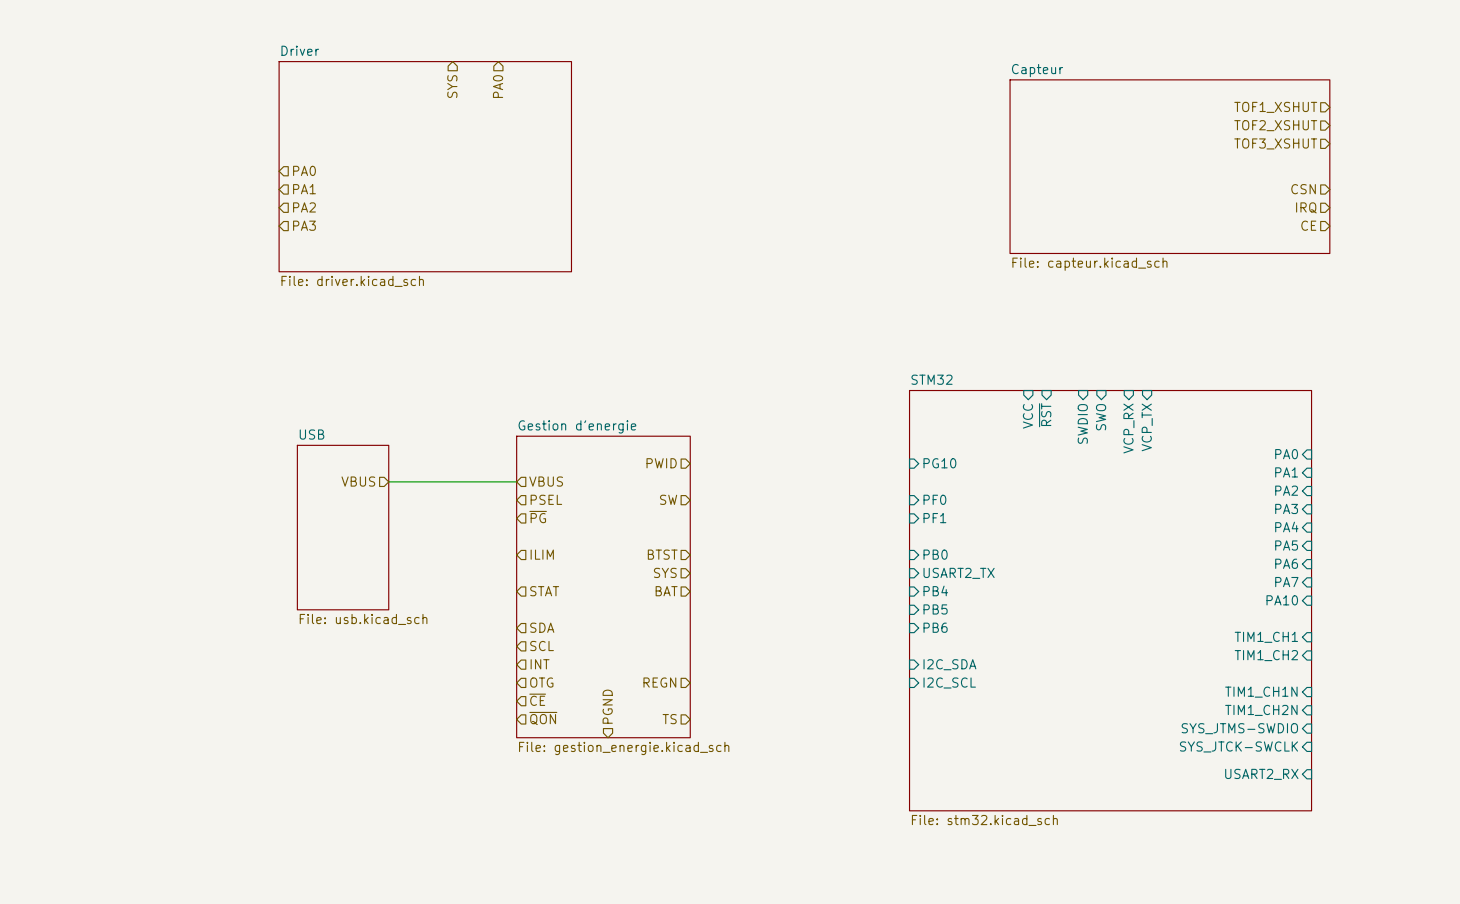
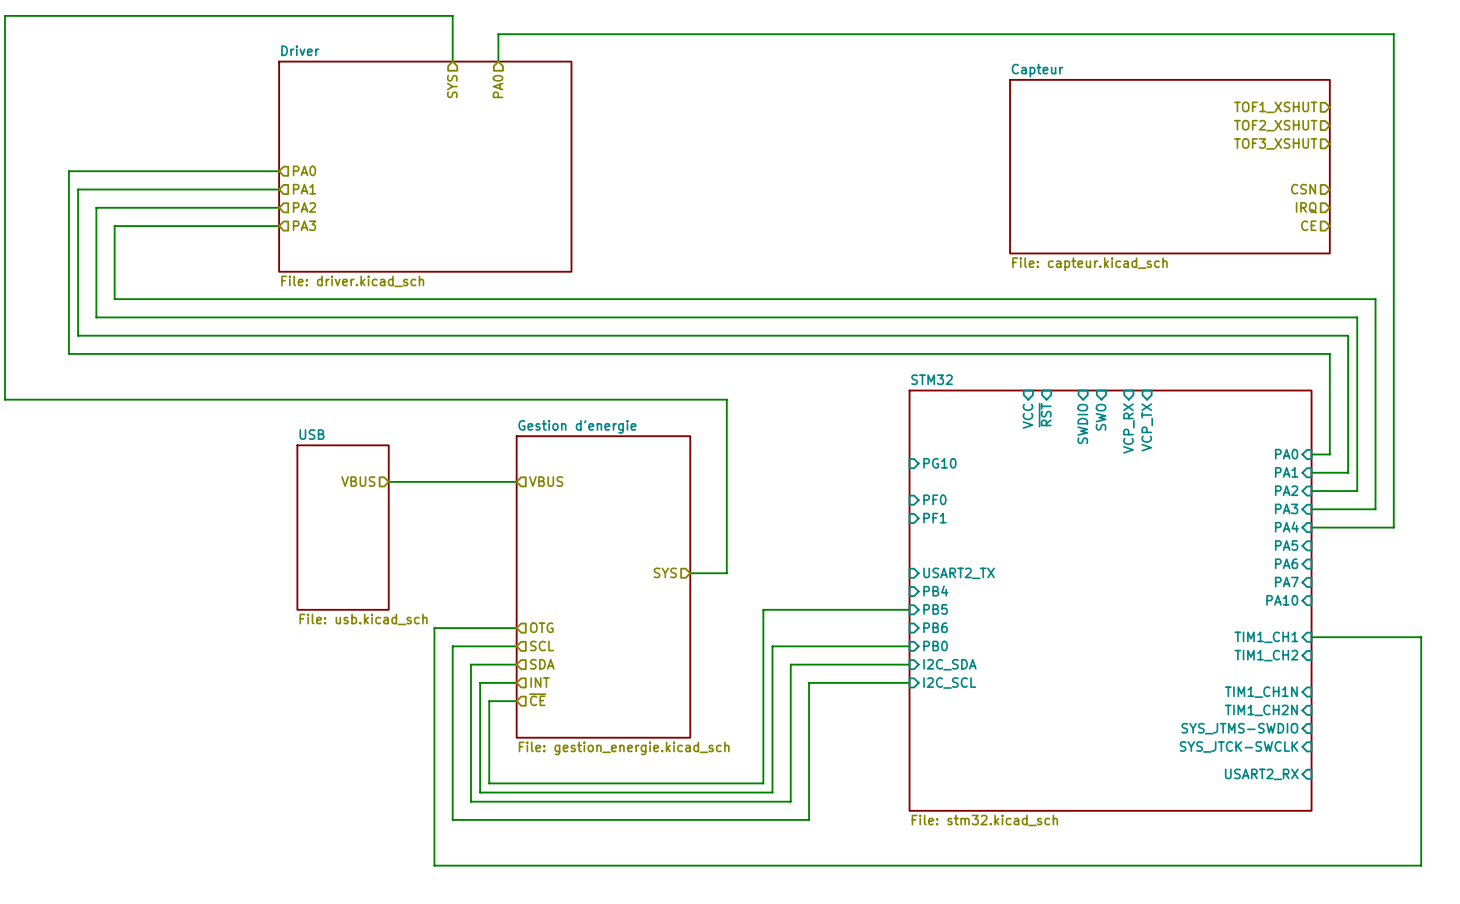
wire: none -> (452, 61) (452, 15) (5, 15) (5, 399) (726, 399) (726, 573) (690, 573)
wire: none -> (498, 61) (498, 34) (1393, 34) (1393, 527) (1311, 527)
wire: none -> (279, 171) (68, 171) (68, 353) (1329, 353) (1329, 454) (1311, 454)
wire: none -> (279, 189) (78, 189) (78, 335) (1348, 335) (1348, 472) (1311, 472)
wire: none -> (279, 207) (96, 207) (96, 317) (1357, 317) (1357, 491) (1311, 491)
wire: none -> (279, 226) (114, 226) (114, 299) (1375, 299) (1375, 509) (1311, 509)
hierarchical label: PWID (661, 463) -> none
hierarchical label: PSEL (546, 499) -> none
hierarchical label: SW (668, 499) -> none
hierarchical label: ~{PG} (538, 517) -> none
hierarchical label: ILIM (542, 554) -> none
hierarchical label: BTST (662, 554) -> none
sheet pin position: PB0 (935, 554) -> PB0 (935, 646)
hierarchical label: STAT (544, 591) -> none
hierarchical label: BAT (666, 591) -> none
wire: none -> (909, 609) (763, 609) (763, 783) (489, 783) (489, 701) (516, 701)
hierarchical label: SDA (542, 627) -> OTG (541, 627)
wire: none -> (516, 628) (434, 628) (434, 865) (1421, 865) (1421, 637) (1311, 637)
wire: none -> (516, 646) (452, 646) (452, 819) (809, 819) (809, 682) (909, 682)
wire: none -> (909, 646) (772, 646) (772, 792) (480, 792) (480, 682) (516, 682)
wire: none -> (516, 664) (470, 664) (470, 801) (790, 801) (790, 664) (909, 664)
hierarchical label: INT (540, 664) -> SDA (542, 664)
hierarchical label: OTG (541, 682) -> INT (540, 682)
hierarchical label: REGN (659, 682) -> none
hierarchical label: PGND (607, 706) -> none
hierarchical label: ~{QON} (543, 718) -> none
hierarchical label: TS (669, 719) -> none

